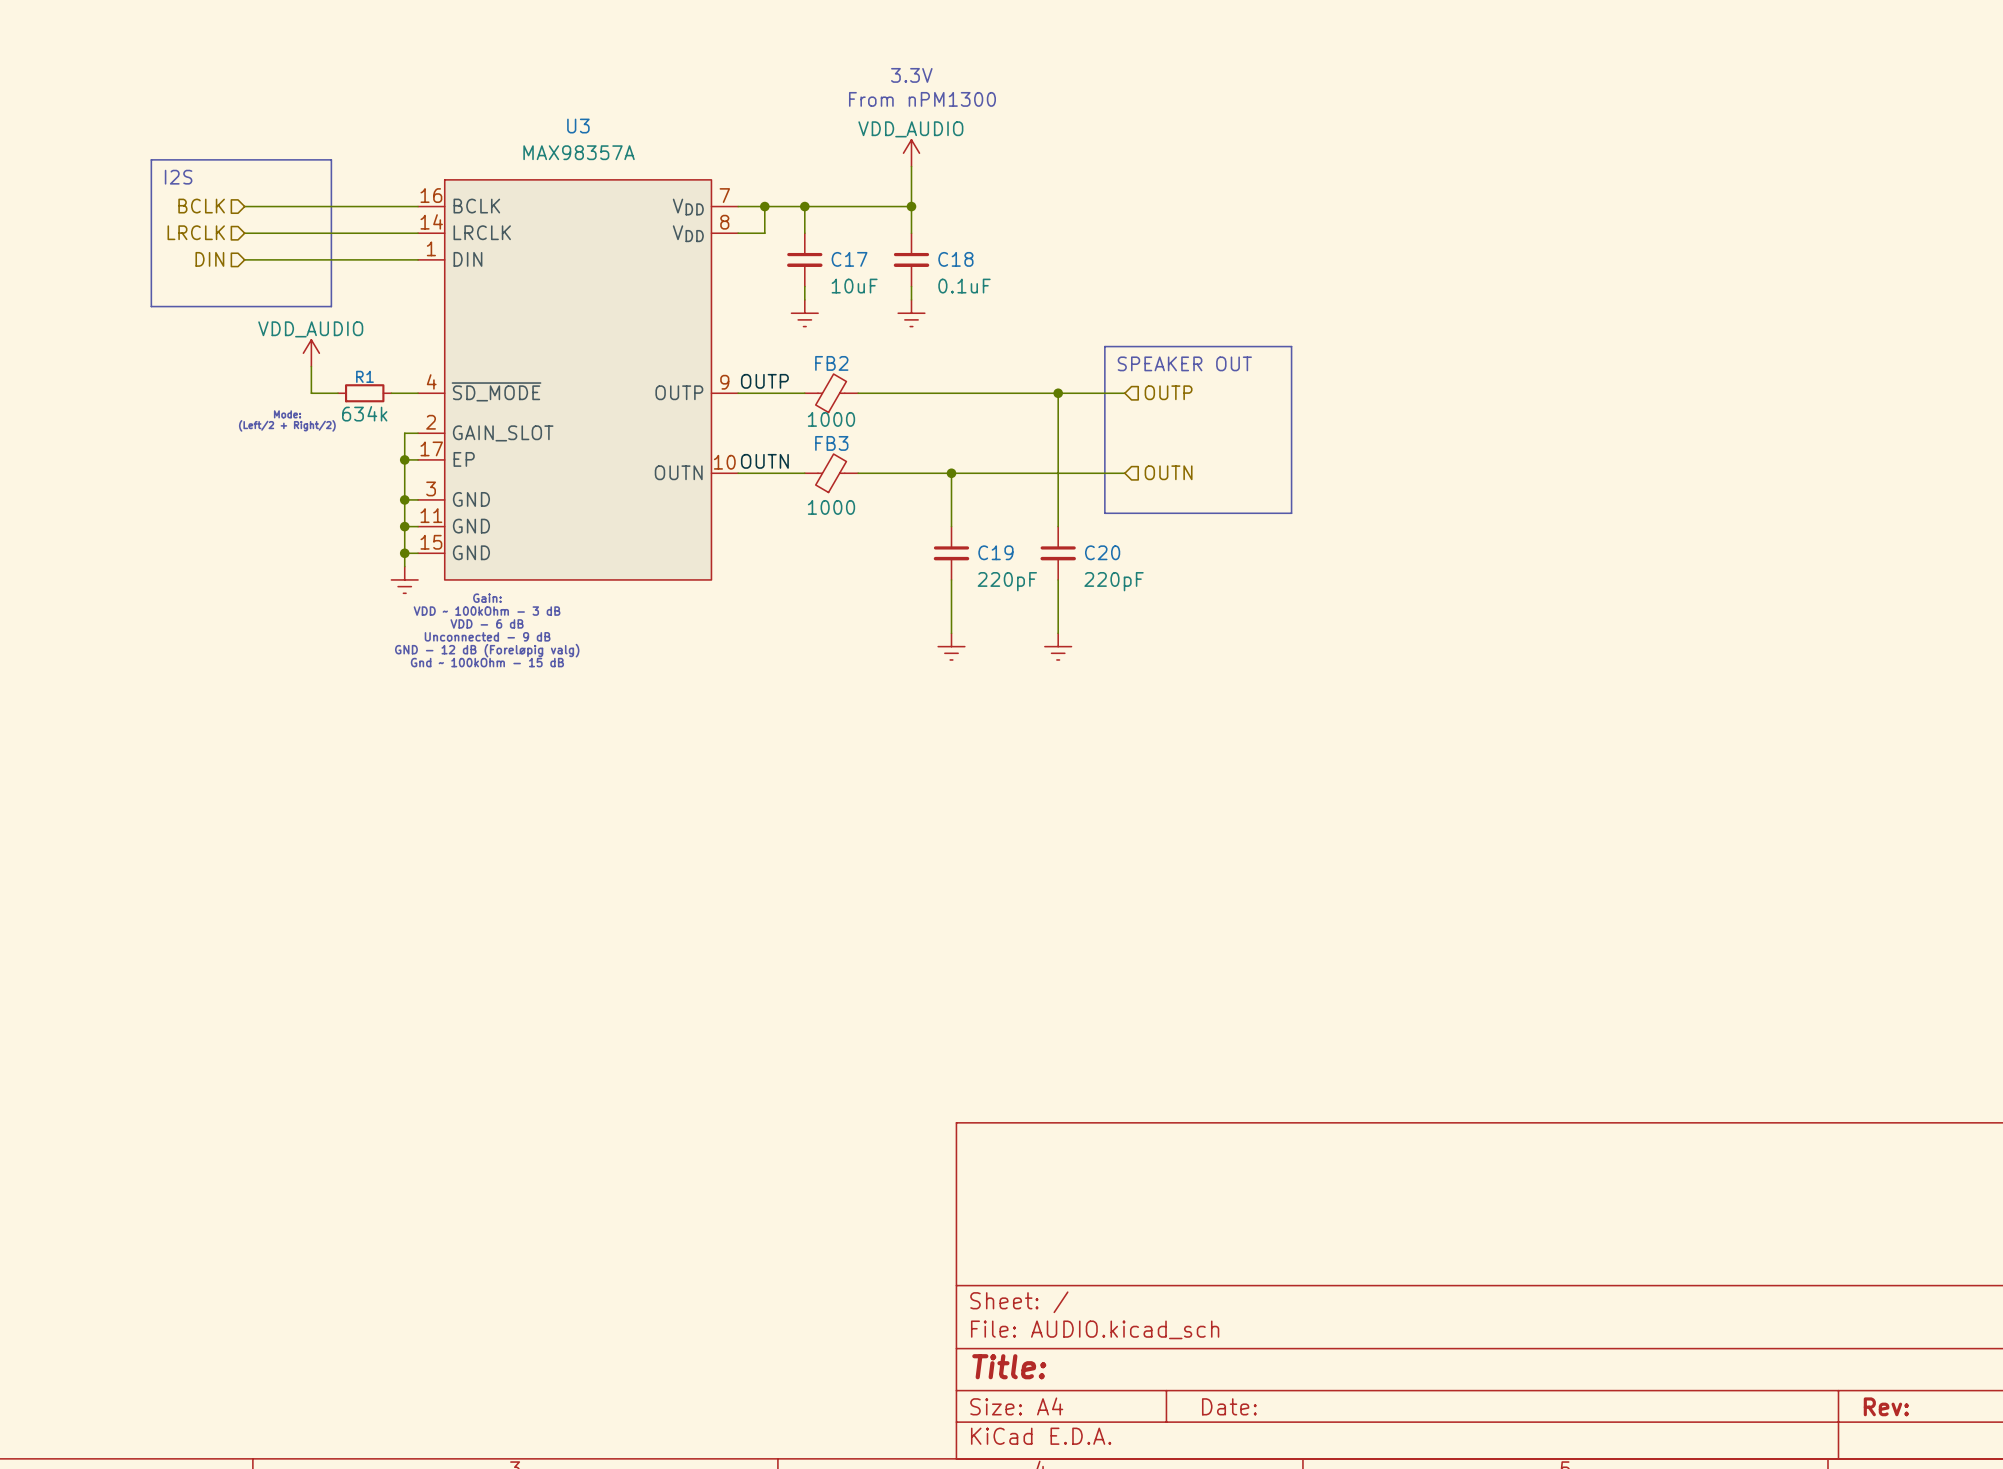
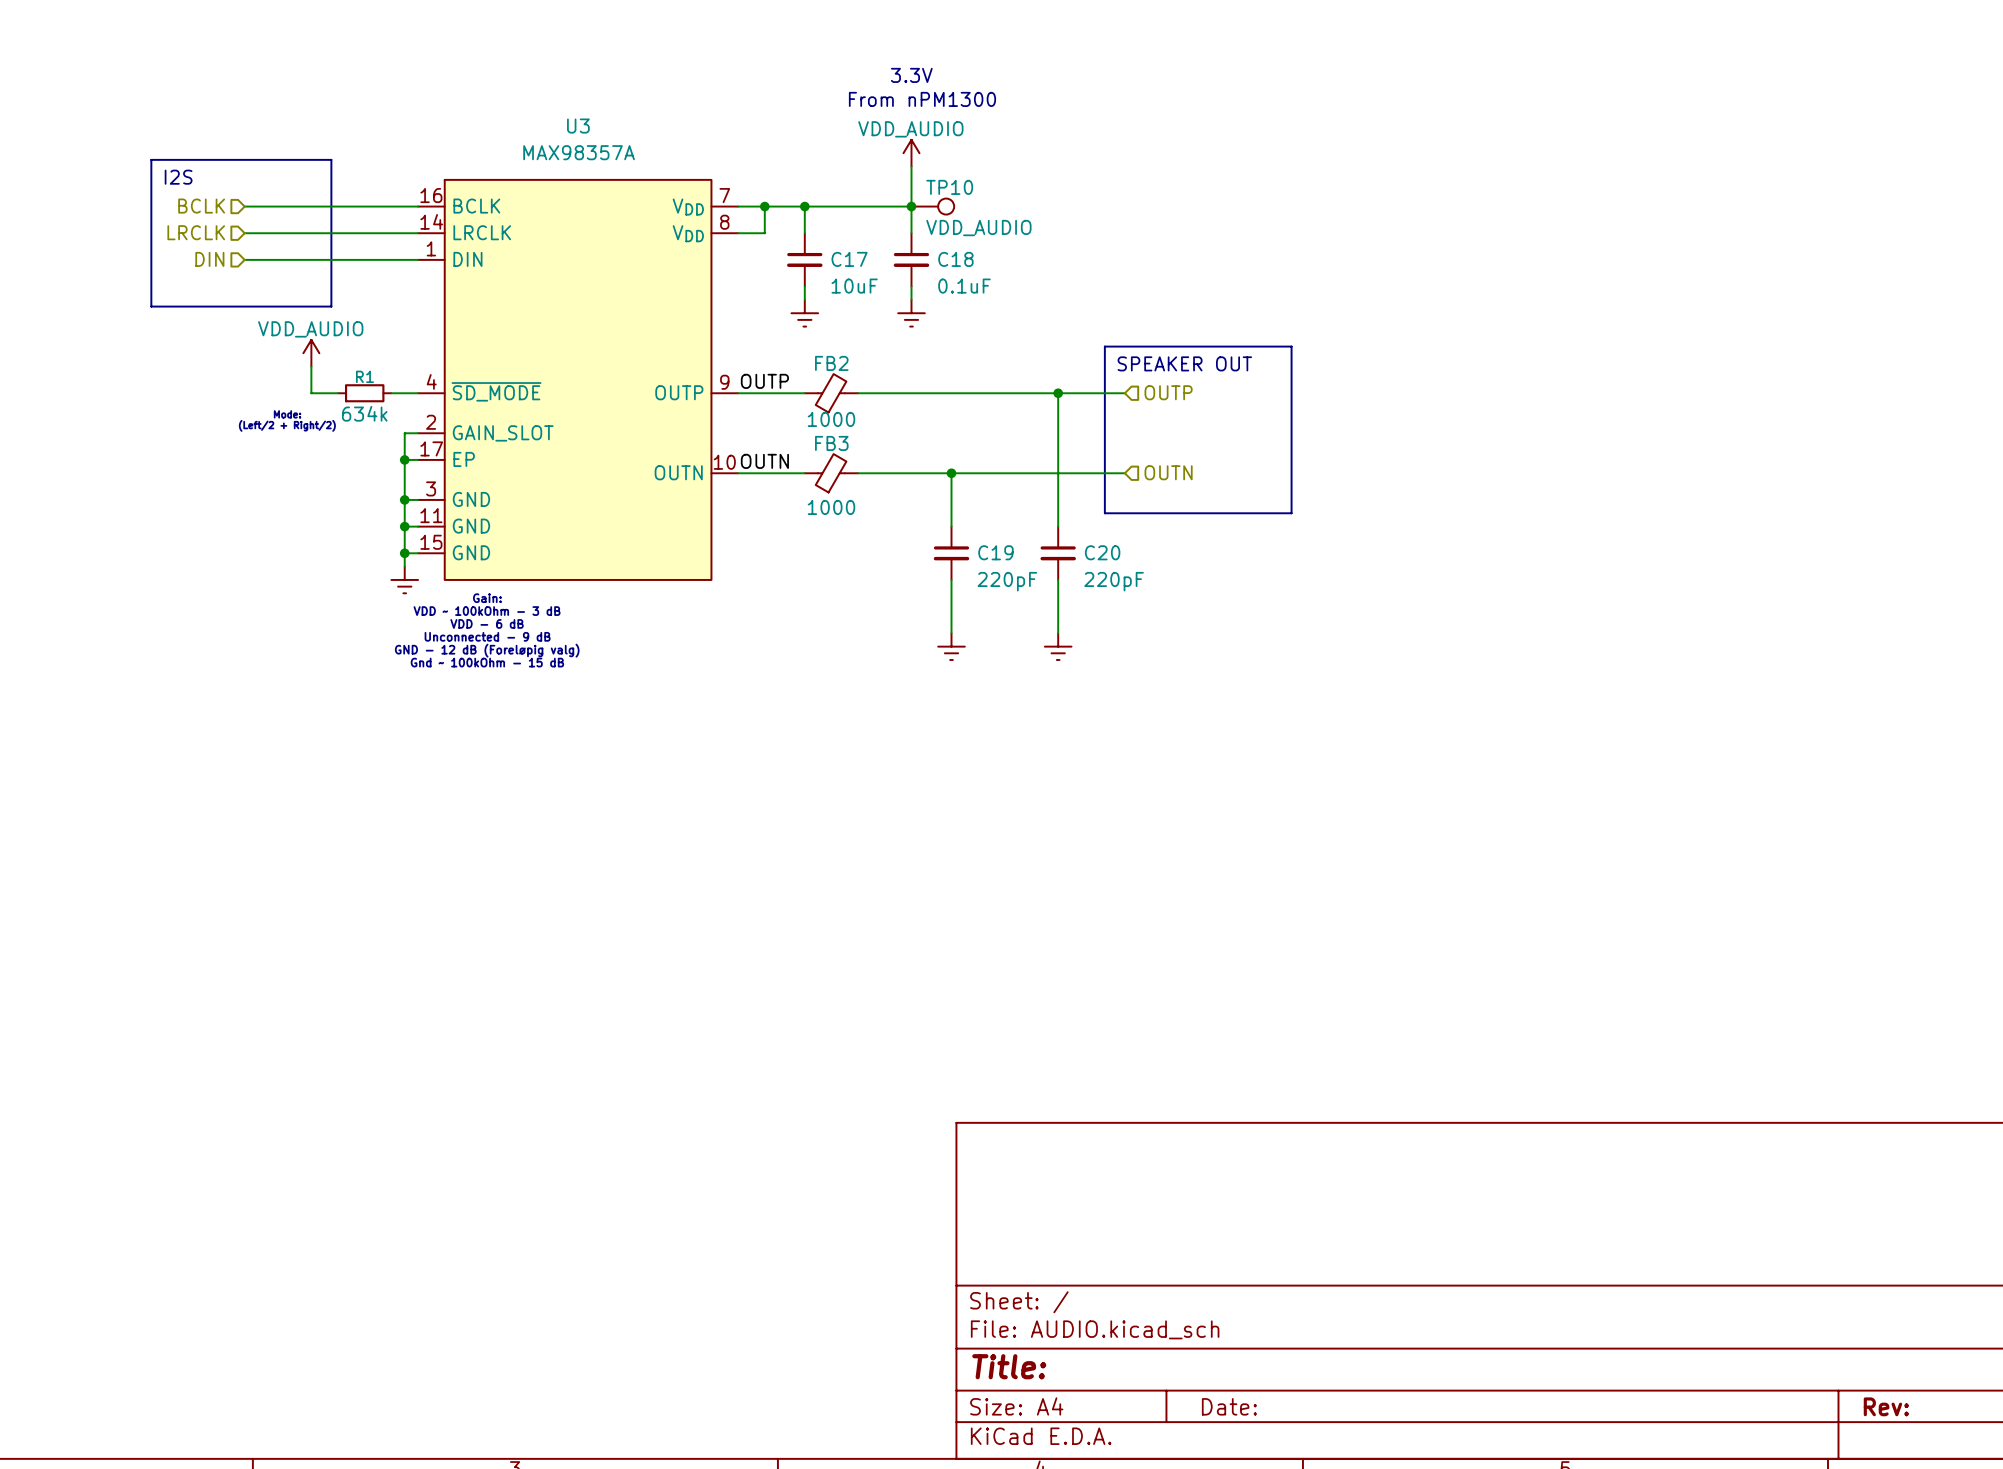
TP10: none -> VDD_AUDIO (932, 206)

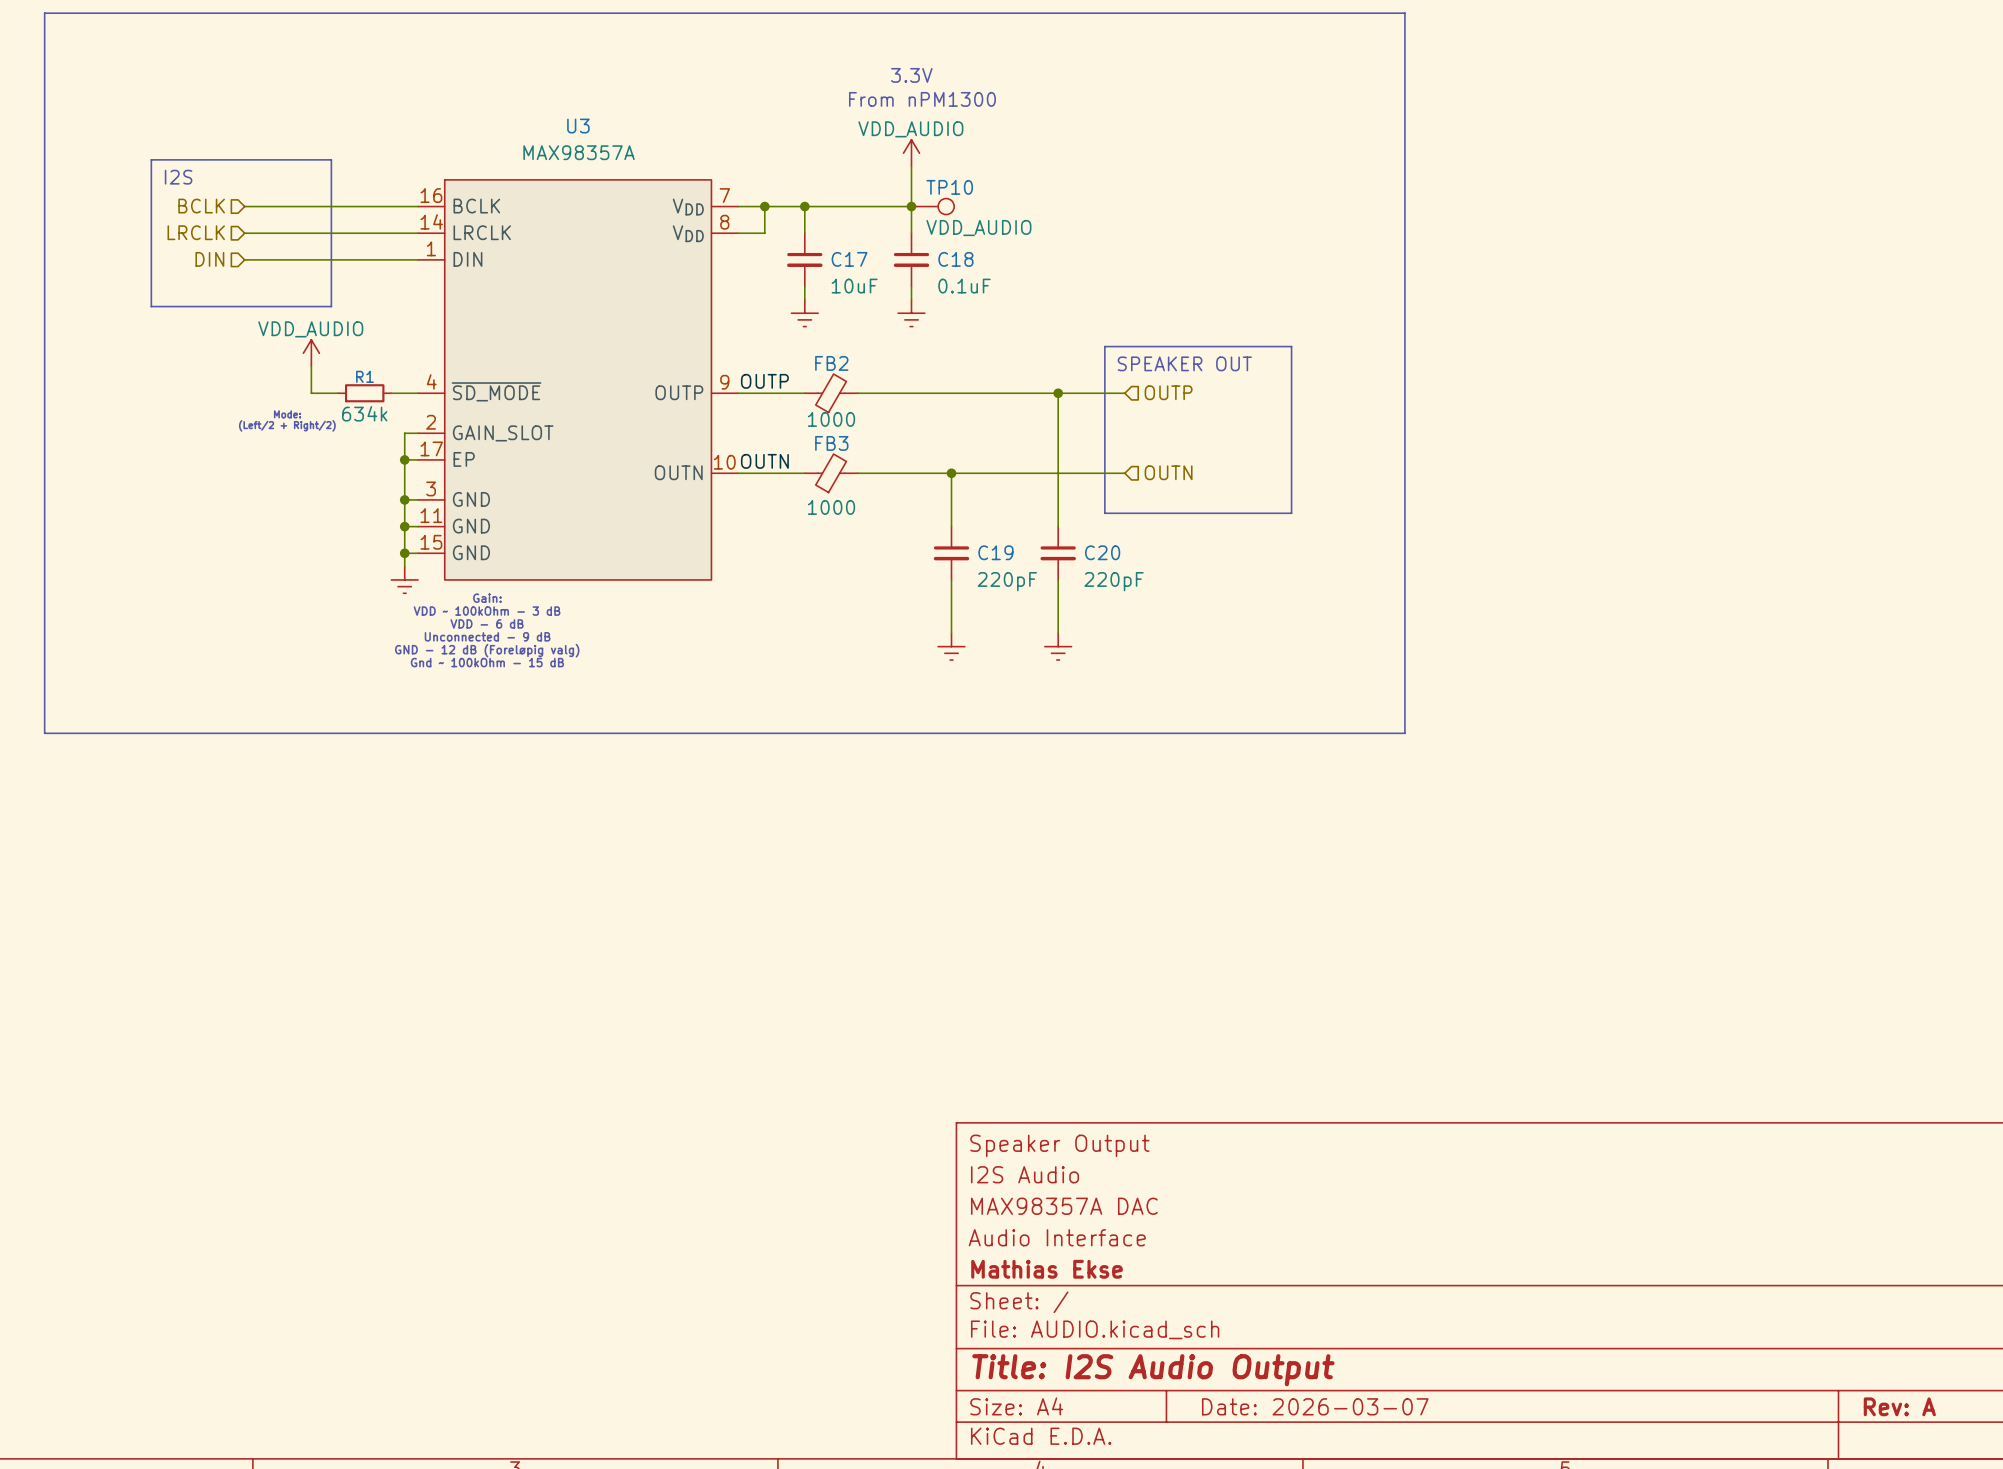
line: none -> (44, 13) (1404, 13) (1404, 733) (44, 733) (44, 13)
title block: none -> Speaker Output (1059, 1145)
title block: none -> I2S Audio (1024, 1174)
title block: none -> MAX98357A DAC (1064, 1206)
title block: none -> Audio Interface (1057, 1237)
title block: none -> Mathias Ekse (1047, 1269)
title block: Title: (1009, 1366) -> Title: I2S Audio Output (1153, 1370)
title block: Date: (1229, 1406) -> Date: 2026-03-07 (1315, 1406)
title block: Rev: (1886, 1406) -> Rev: A (1899, 1406)

